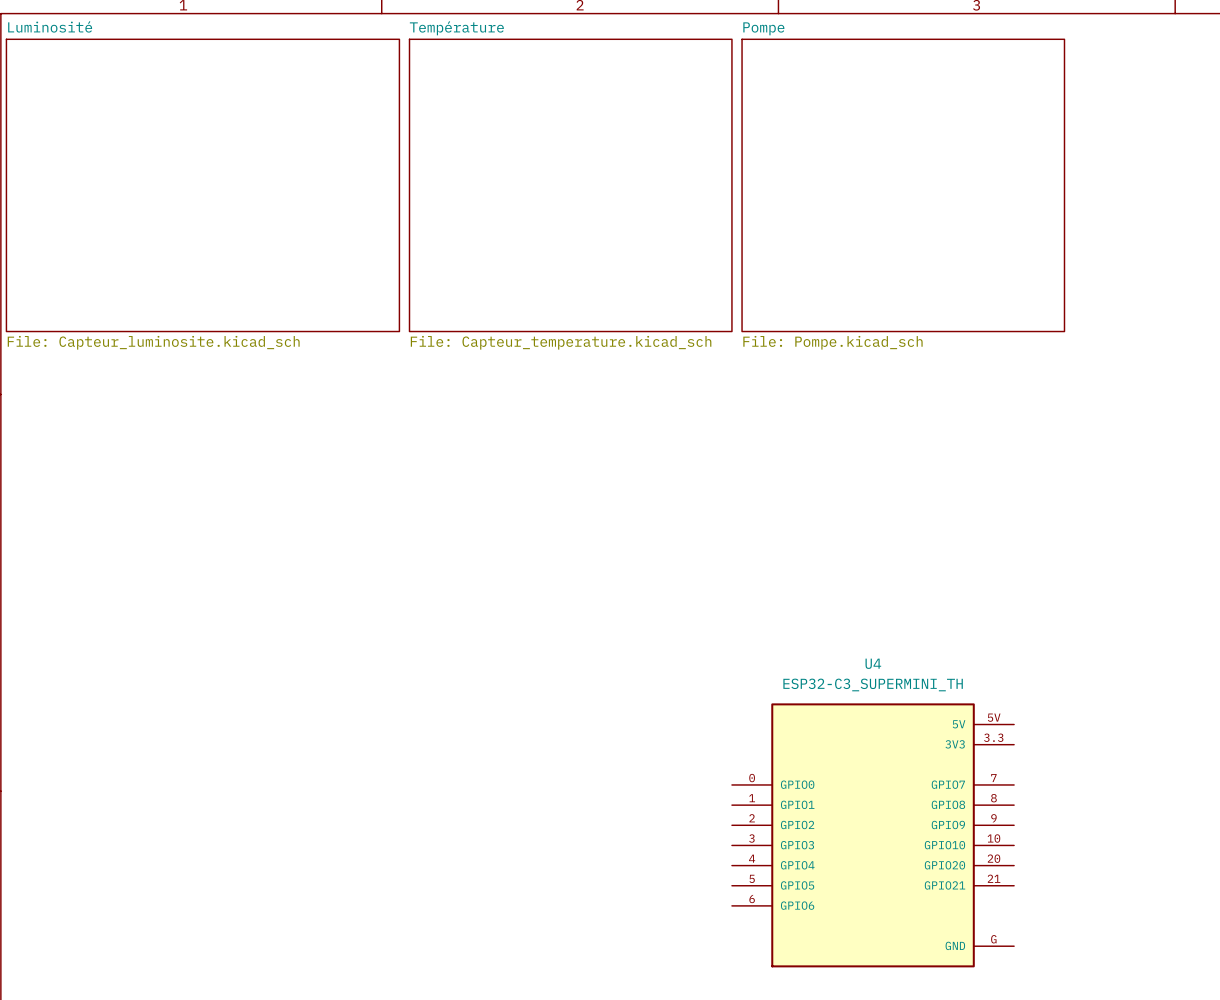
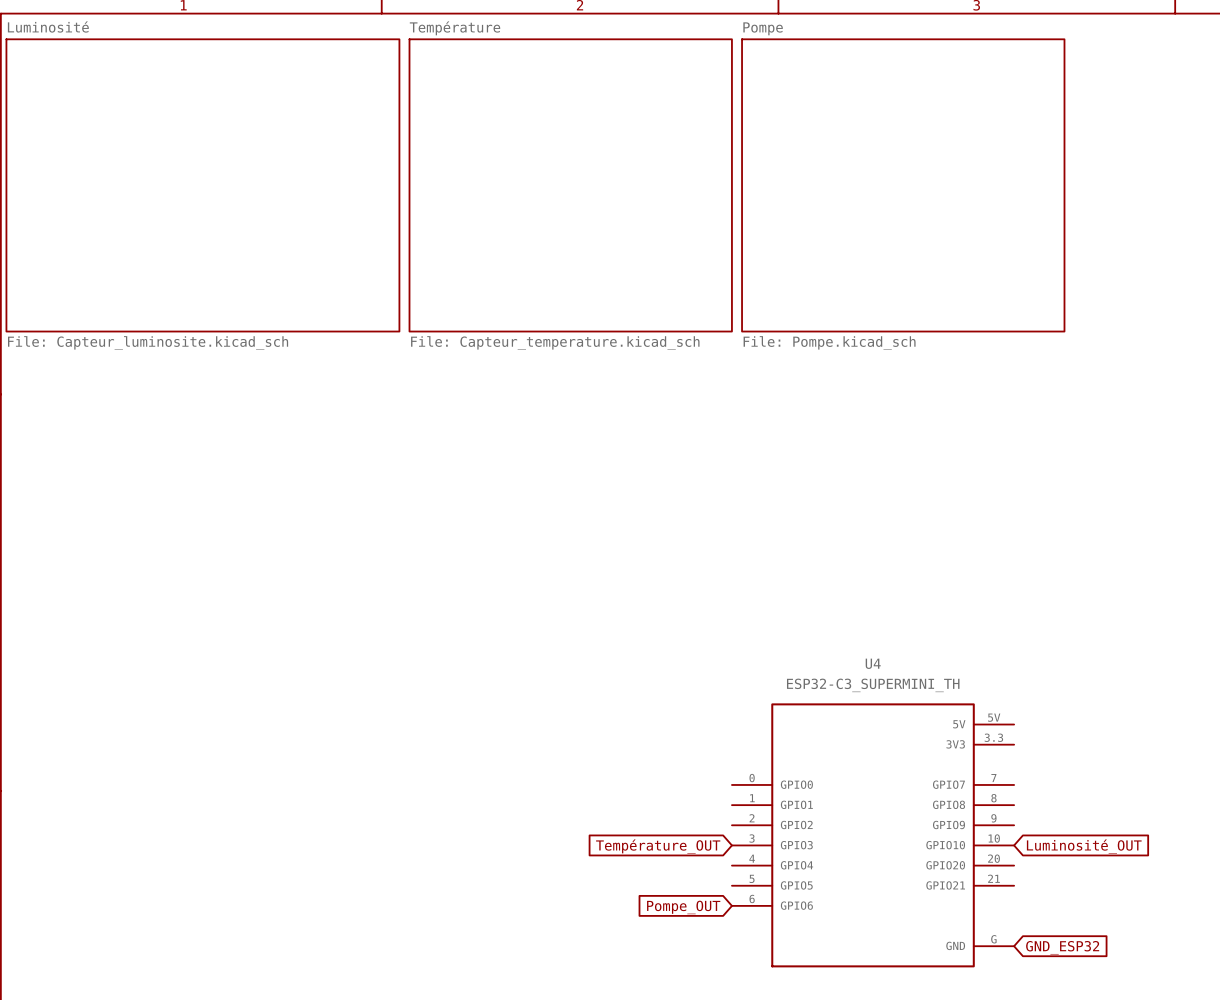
global label: none -> Température_OUT (658, 846)
global label: none -> Luminosité_OUT (1084, 846)
global label: none -> Pompe_OUT (683, 907)
global label: none -> GND_ESP32 (1062, 947)

